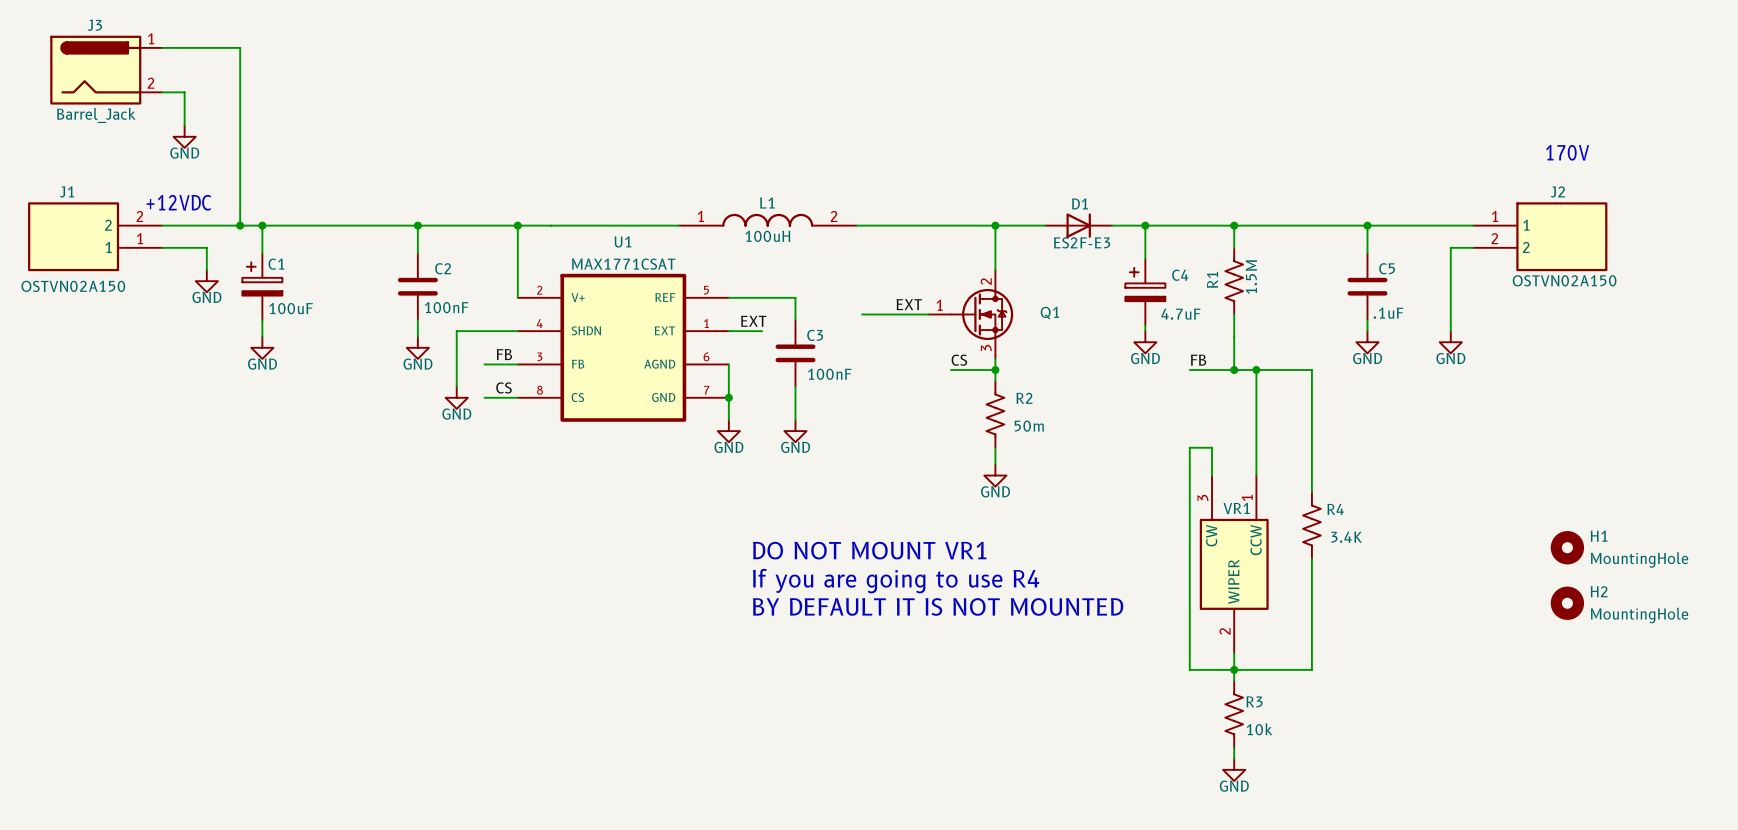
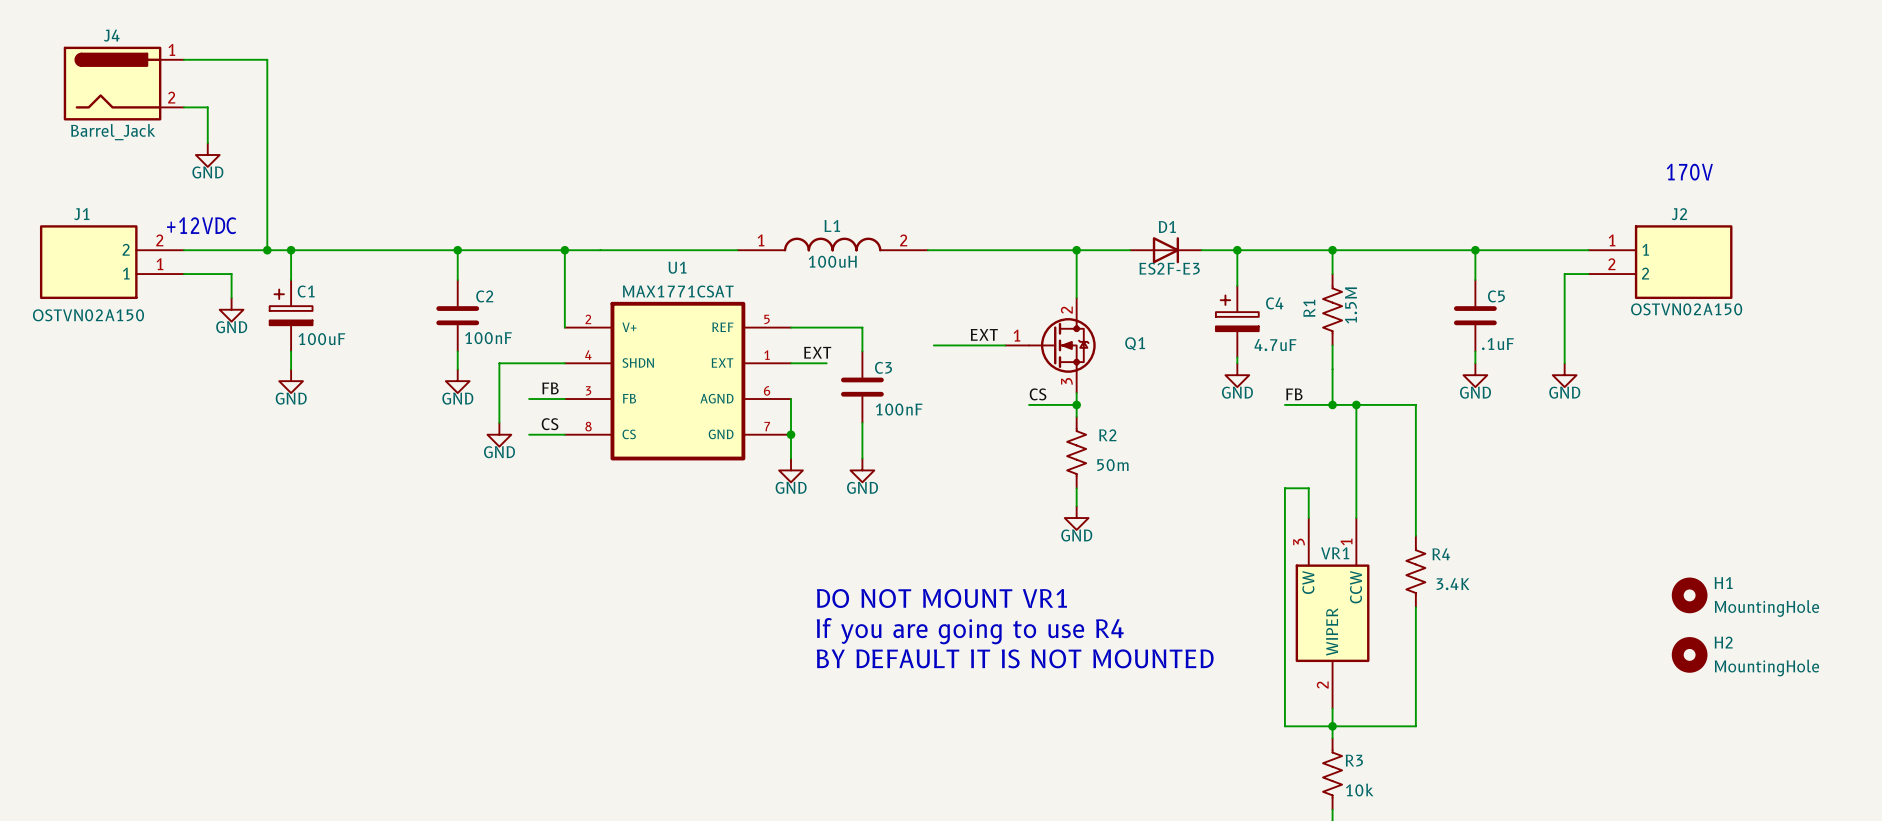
J3 name: J3 (94, 25) -> J4 (111, 35)

